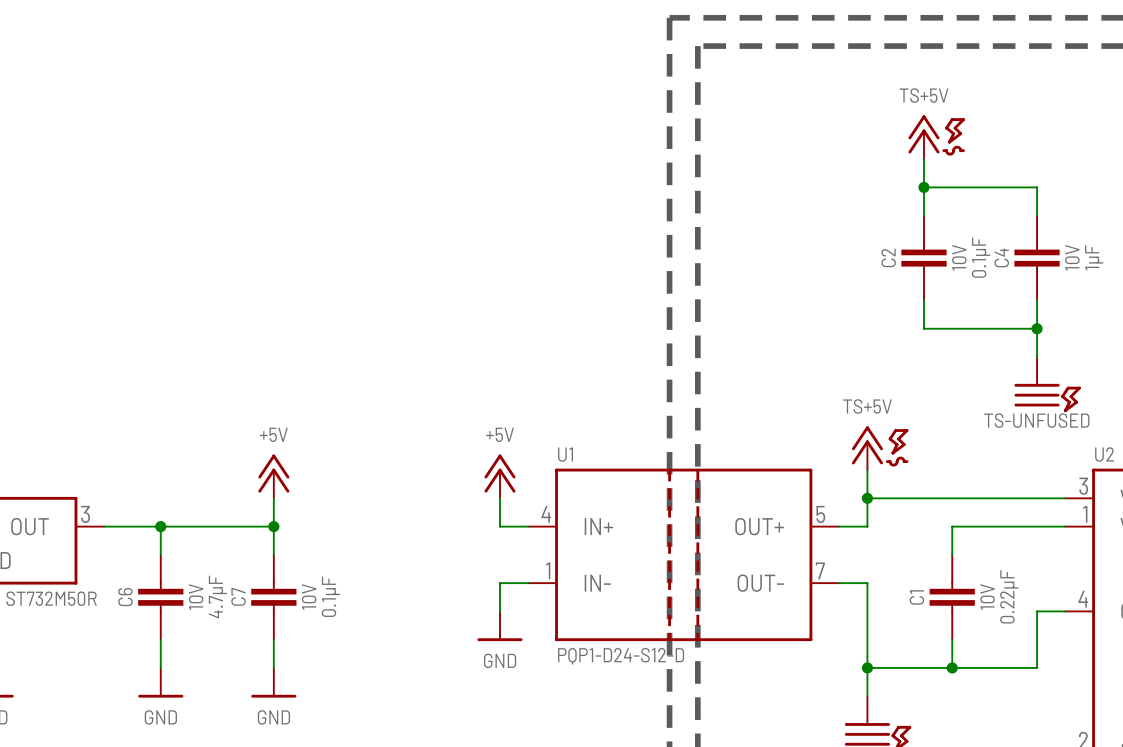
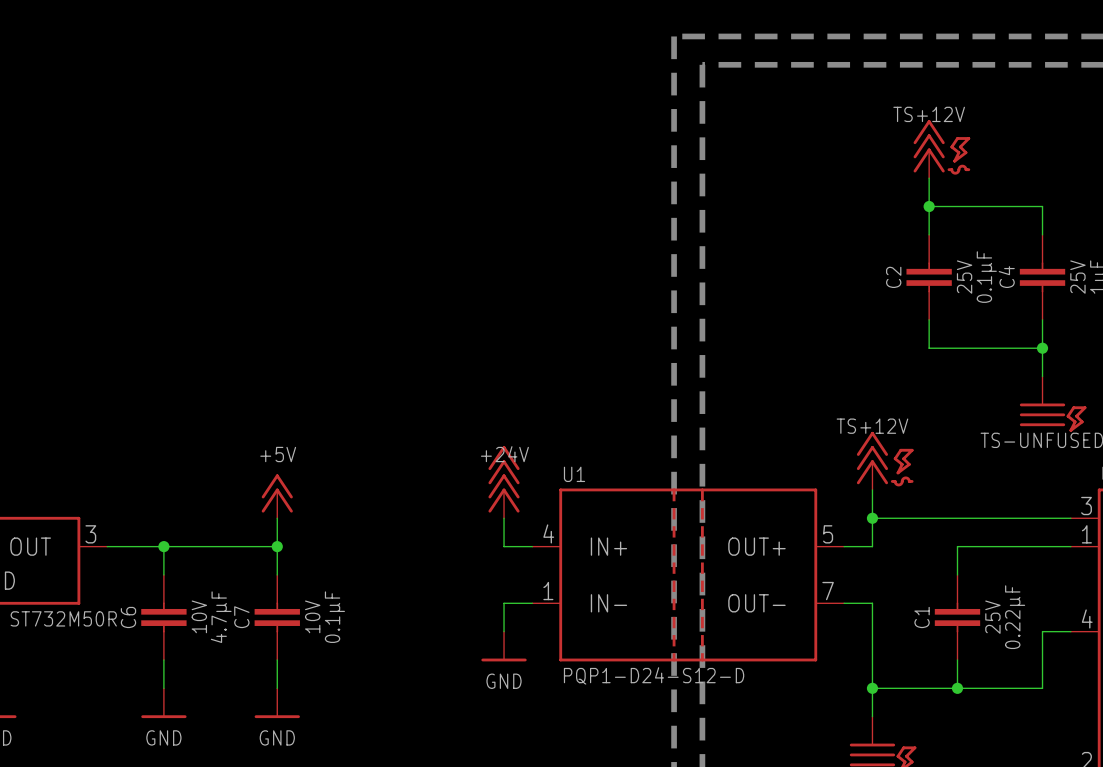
power symbol: TS+5V (936, 137) -> TS+12V (941, 149)
C2 text: 10V (959, 257) -> 25V (964, 277)
C4 text: 10V (1072, 257) -> 25V (1077, 277)
power symbol: TS+5V (880, 448) -> TS+12V (885, 460)
power symbol: none -> +24V (504, 482)
power symbol: +5V (499, 476) -> none
C1 text: 10V (987, 597) -> 25V (992, 617)

